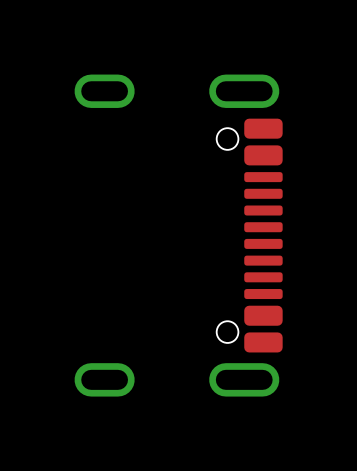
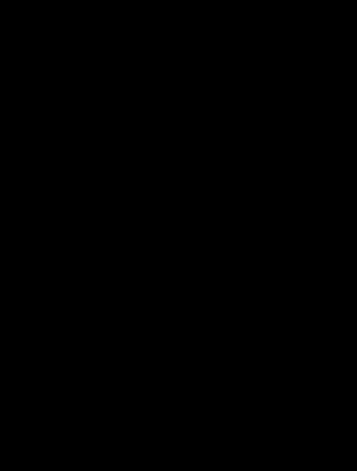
part: (178, 235) -> none

